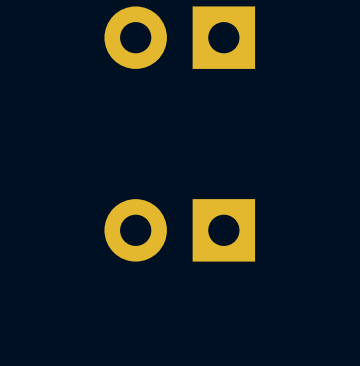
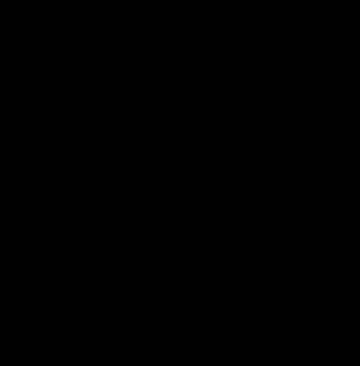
part: (179, 37) -> none
part: (179, 230) -> none

